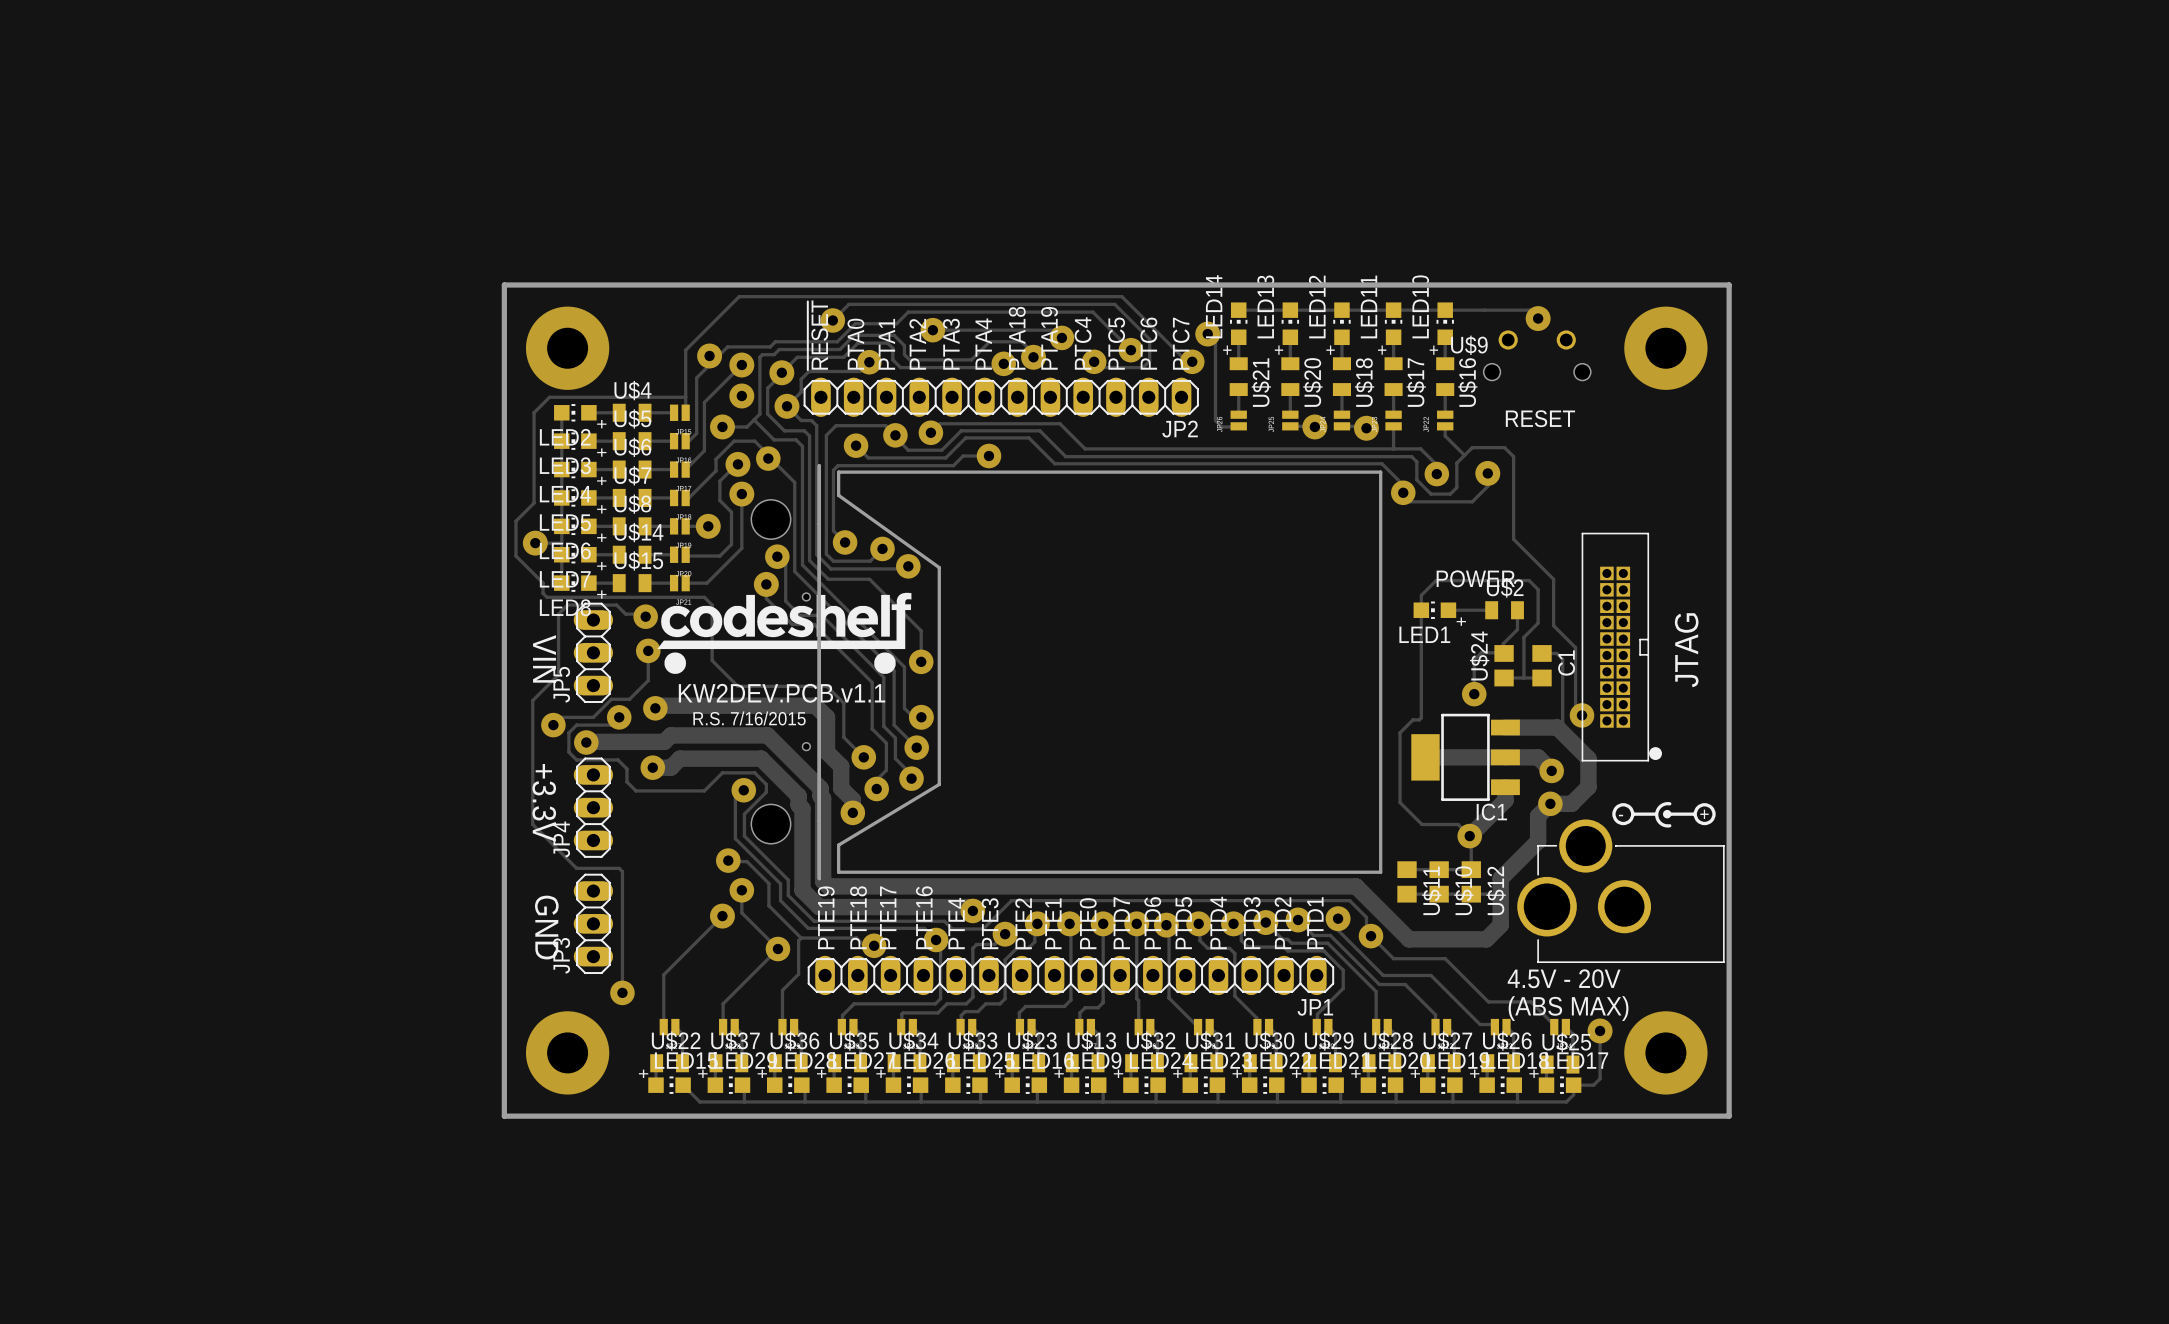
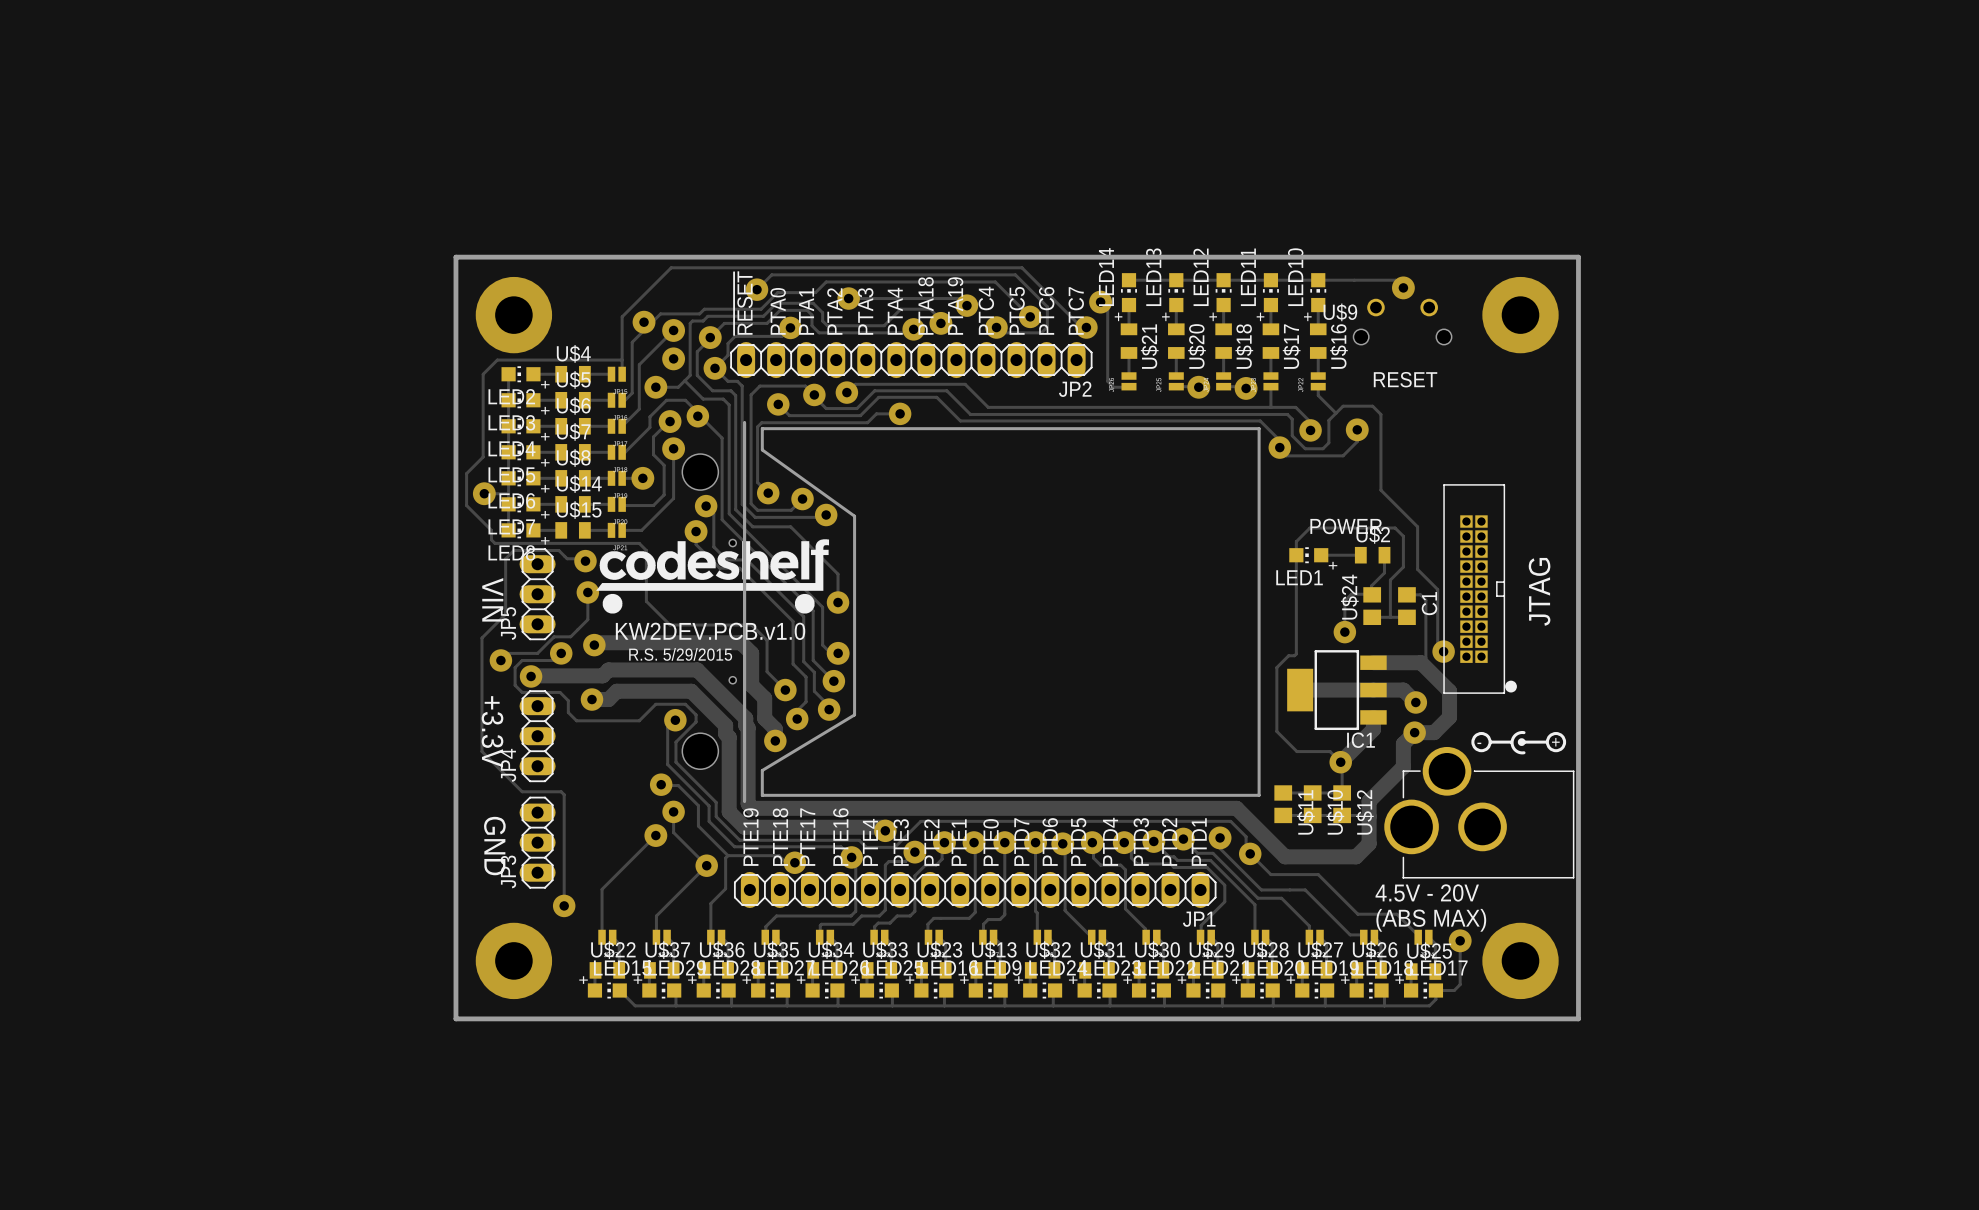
text: KW2DEV.PCB.v1.1 (782, 693) -> KW2DEV.PCB.v1.0 (710, 631)
text: R.S. 7/16/2015 (749, 718) -> R.S. 5/29/2015 (680, 654)

